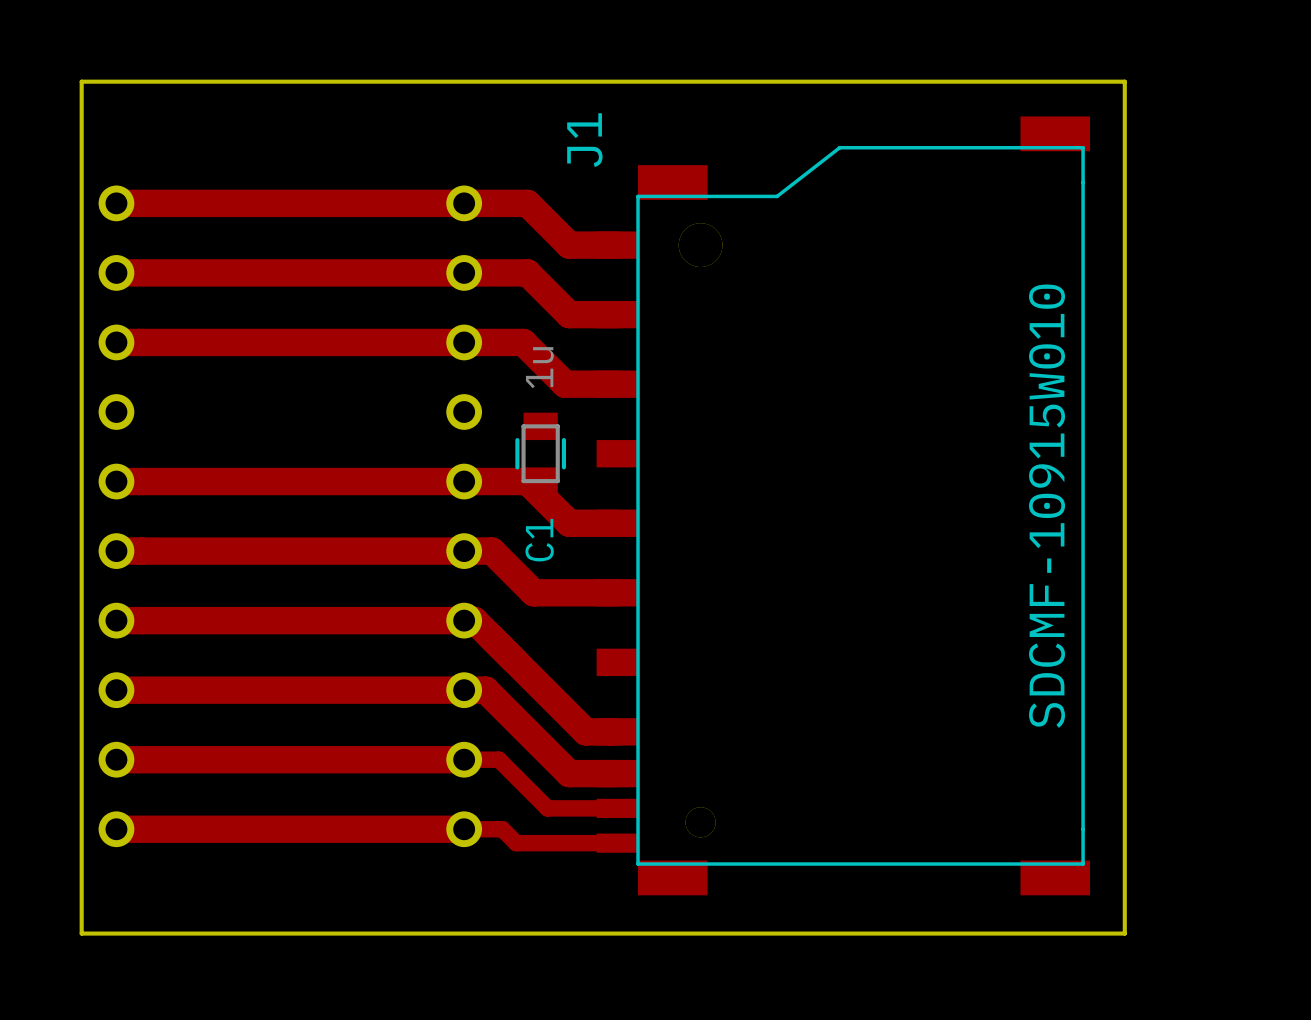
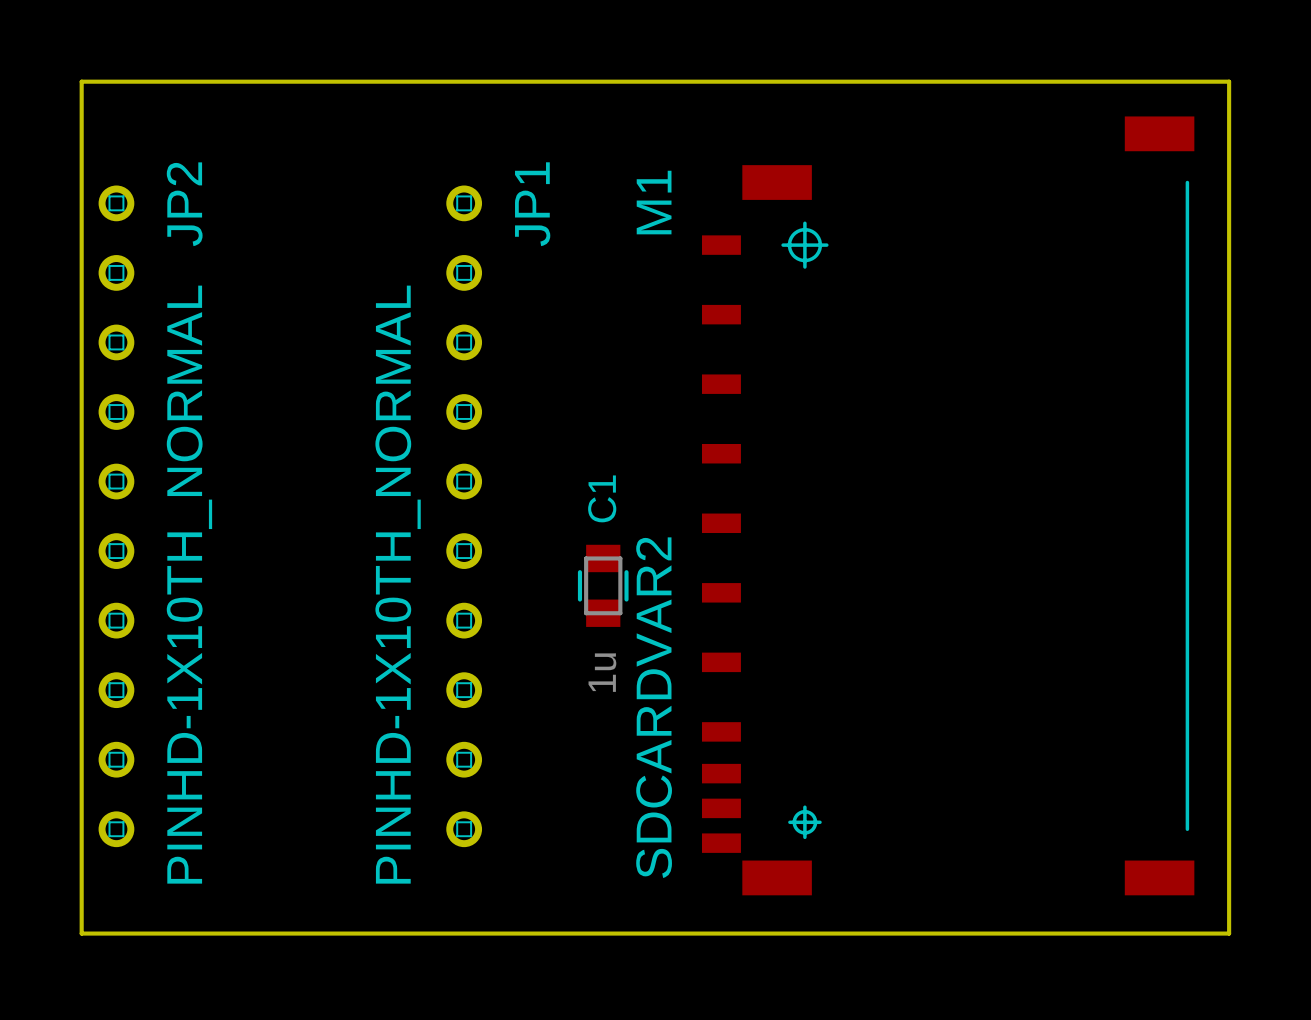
board edge: (1124, 81) (1124, 933) -> (1124, 81) (1229, 81) (1229, 933) (1124, 933)
top track: (116, 203) (527, 203) (569, 245) (617, 245) -> none
top track: (116, 272) (527, 272) (569, 314) (617, 314) -> none
top track: (116, 342) (523, 342) (564, 384) (617, 384) -> none
C1 value position: 1u (539, 367) -> 1u (602, 672)
C1 position: (540, 453) -> (603, 585)
top track: (116, 481) (527, 481) (569, 523) (617, 523) -> none
J1: SDCMF-10915W010 (843, 505) -> none
M1: none -> SDCARDVAR2 (948, 505)
JP2 side: bottom (116, 516) -> top (116, 516)
JP1 side: bottom (464, 516) -> top (464, 516)
C1 name position: C1 (539, 540) -> C1 (602, 498)
top track: (116, 551) (491, 551) (533, 592) (617, 592) -> none
top track: (116, 620) (474, 620) (585, 731) (617, 731) -> none
top track: (116, 690) (485, 690) (569, 773) (617, 773) -> none
top track: (116, 759) (498, 759) (547, 808) (617, 808) -> none
top track: (116, 829) (502, 829) (516, 843) (617, 843) -> none

